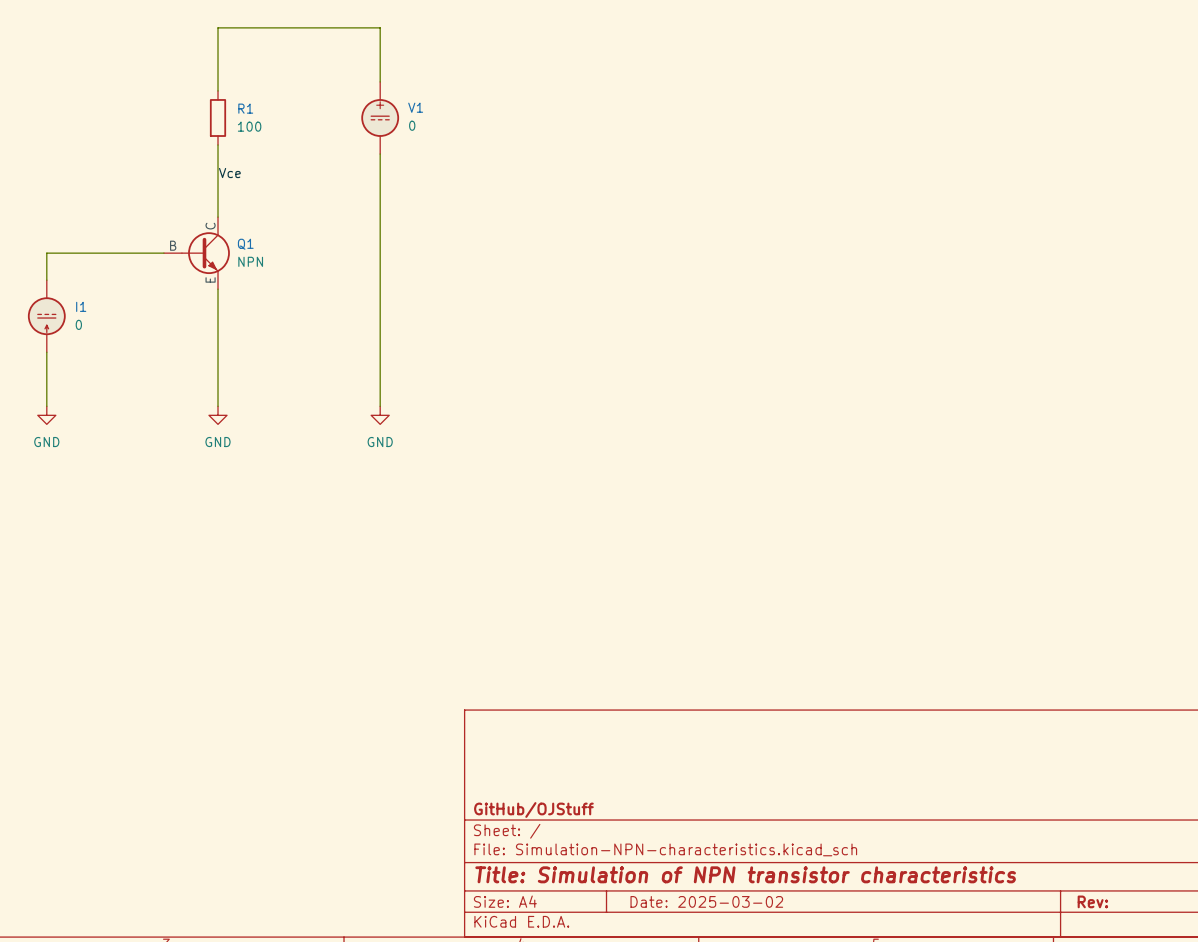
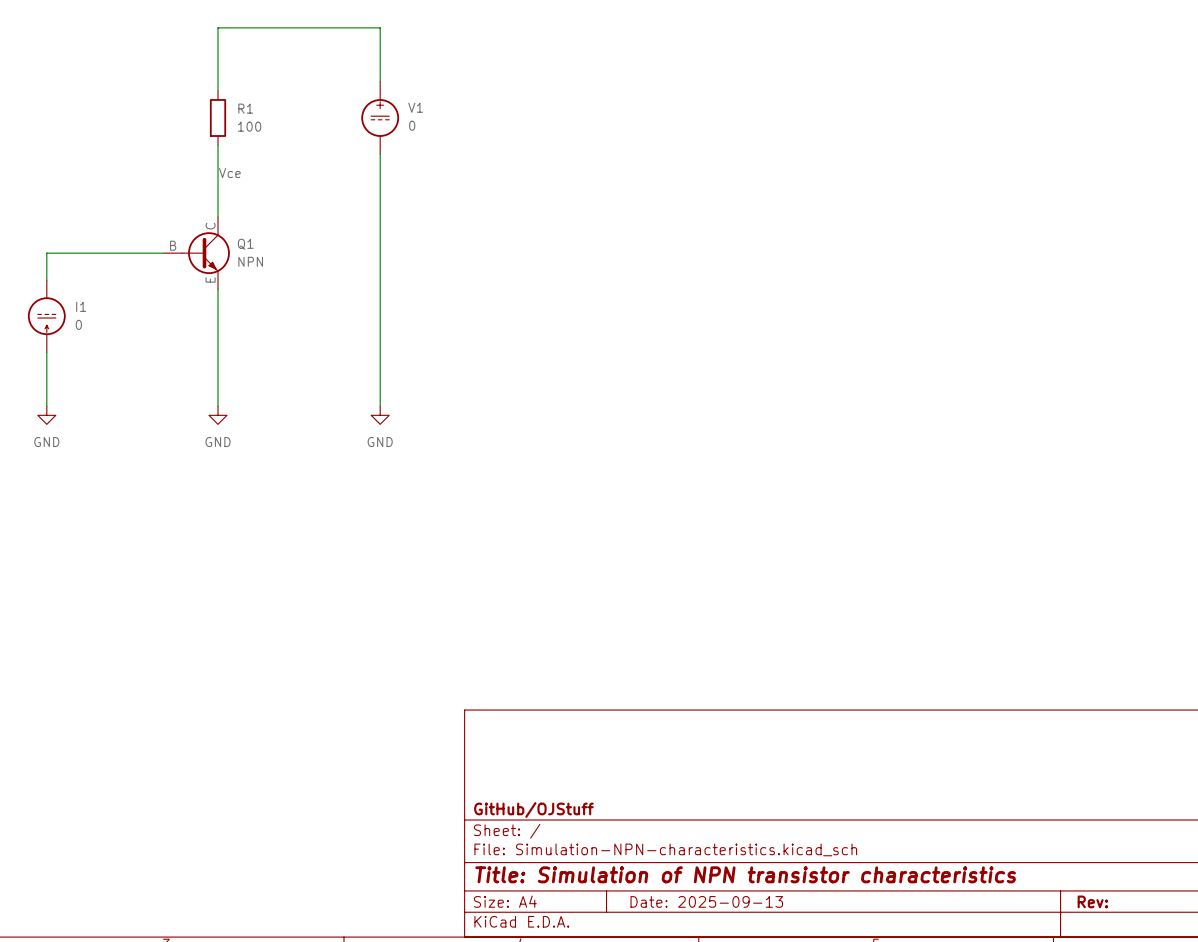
title block: Date: 2025-03-02 (706, 901) -> Date: 2025-09-13 (706, 901)

